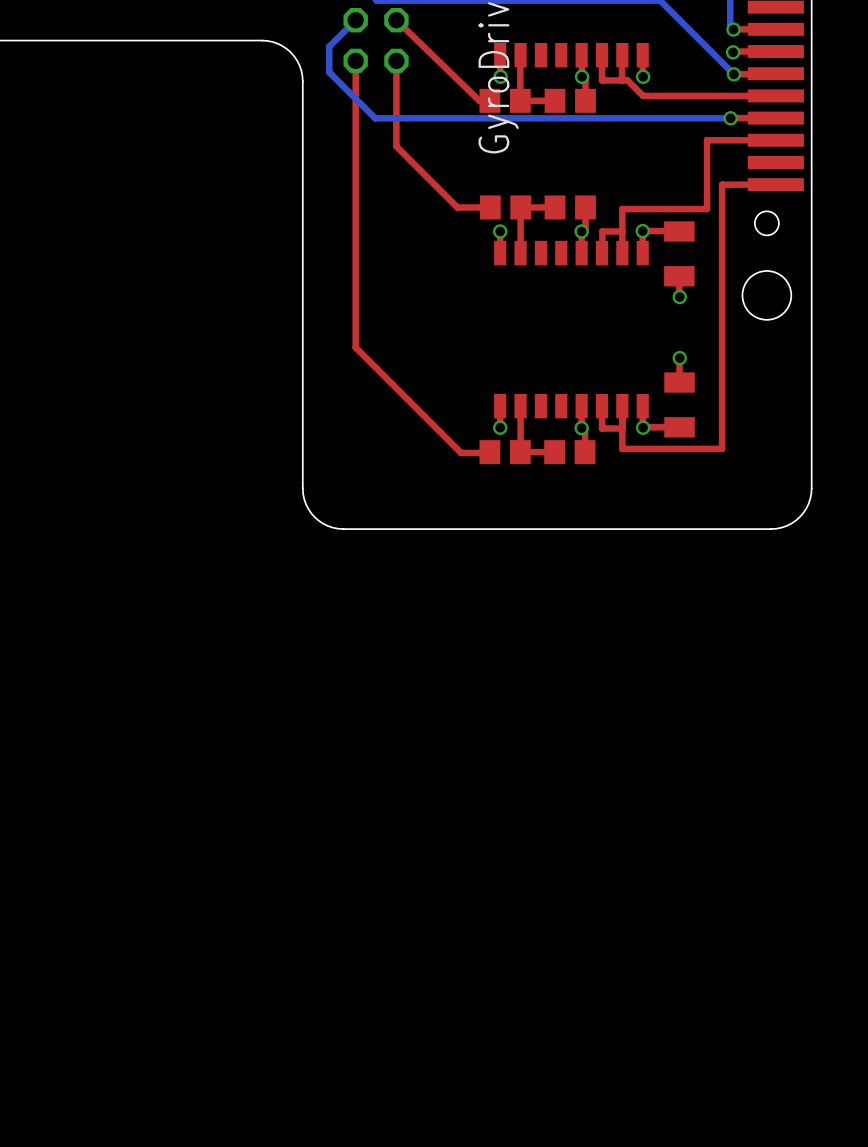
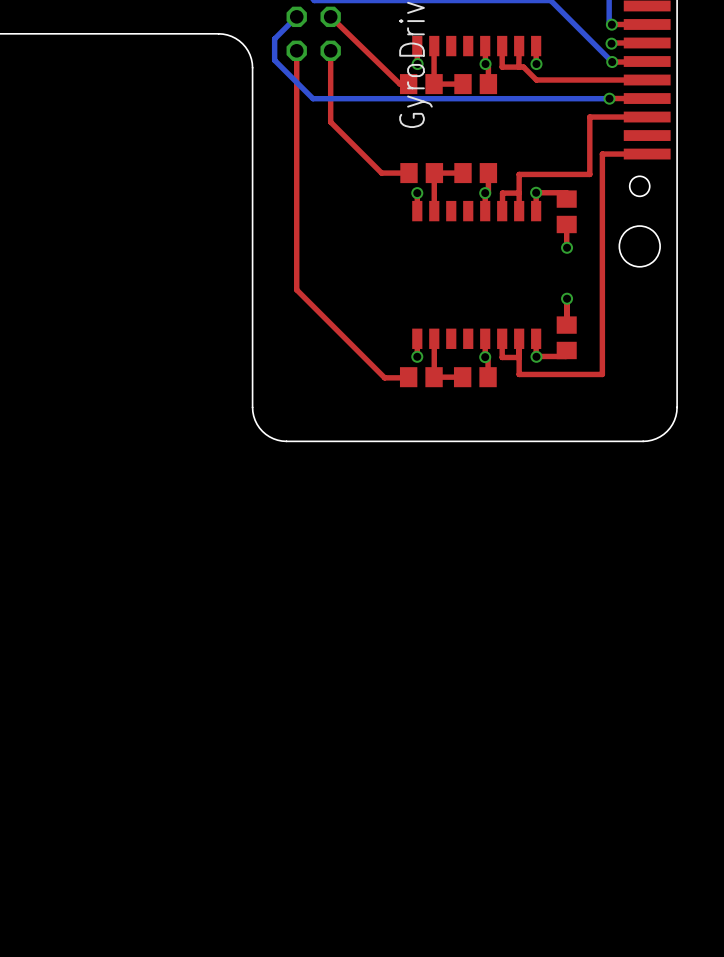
part footprint: [664, 221, 695, 287] -> [556, 190, 577, 234]
part footprint: [664, 372, 695, 438] -> [556, 316, 577, 360]

